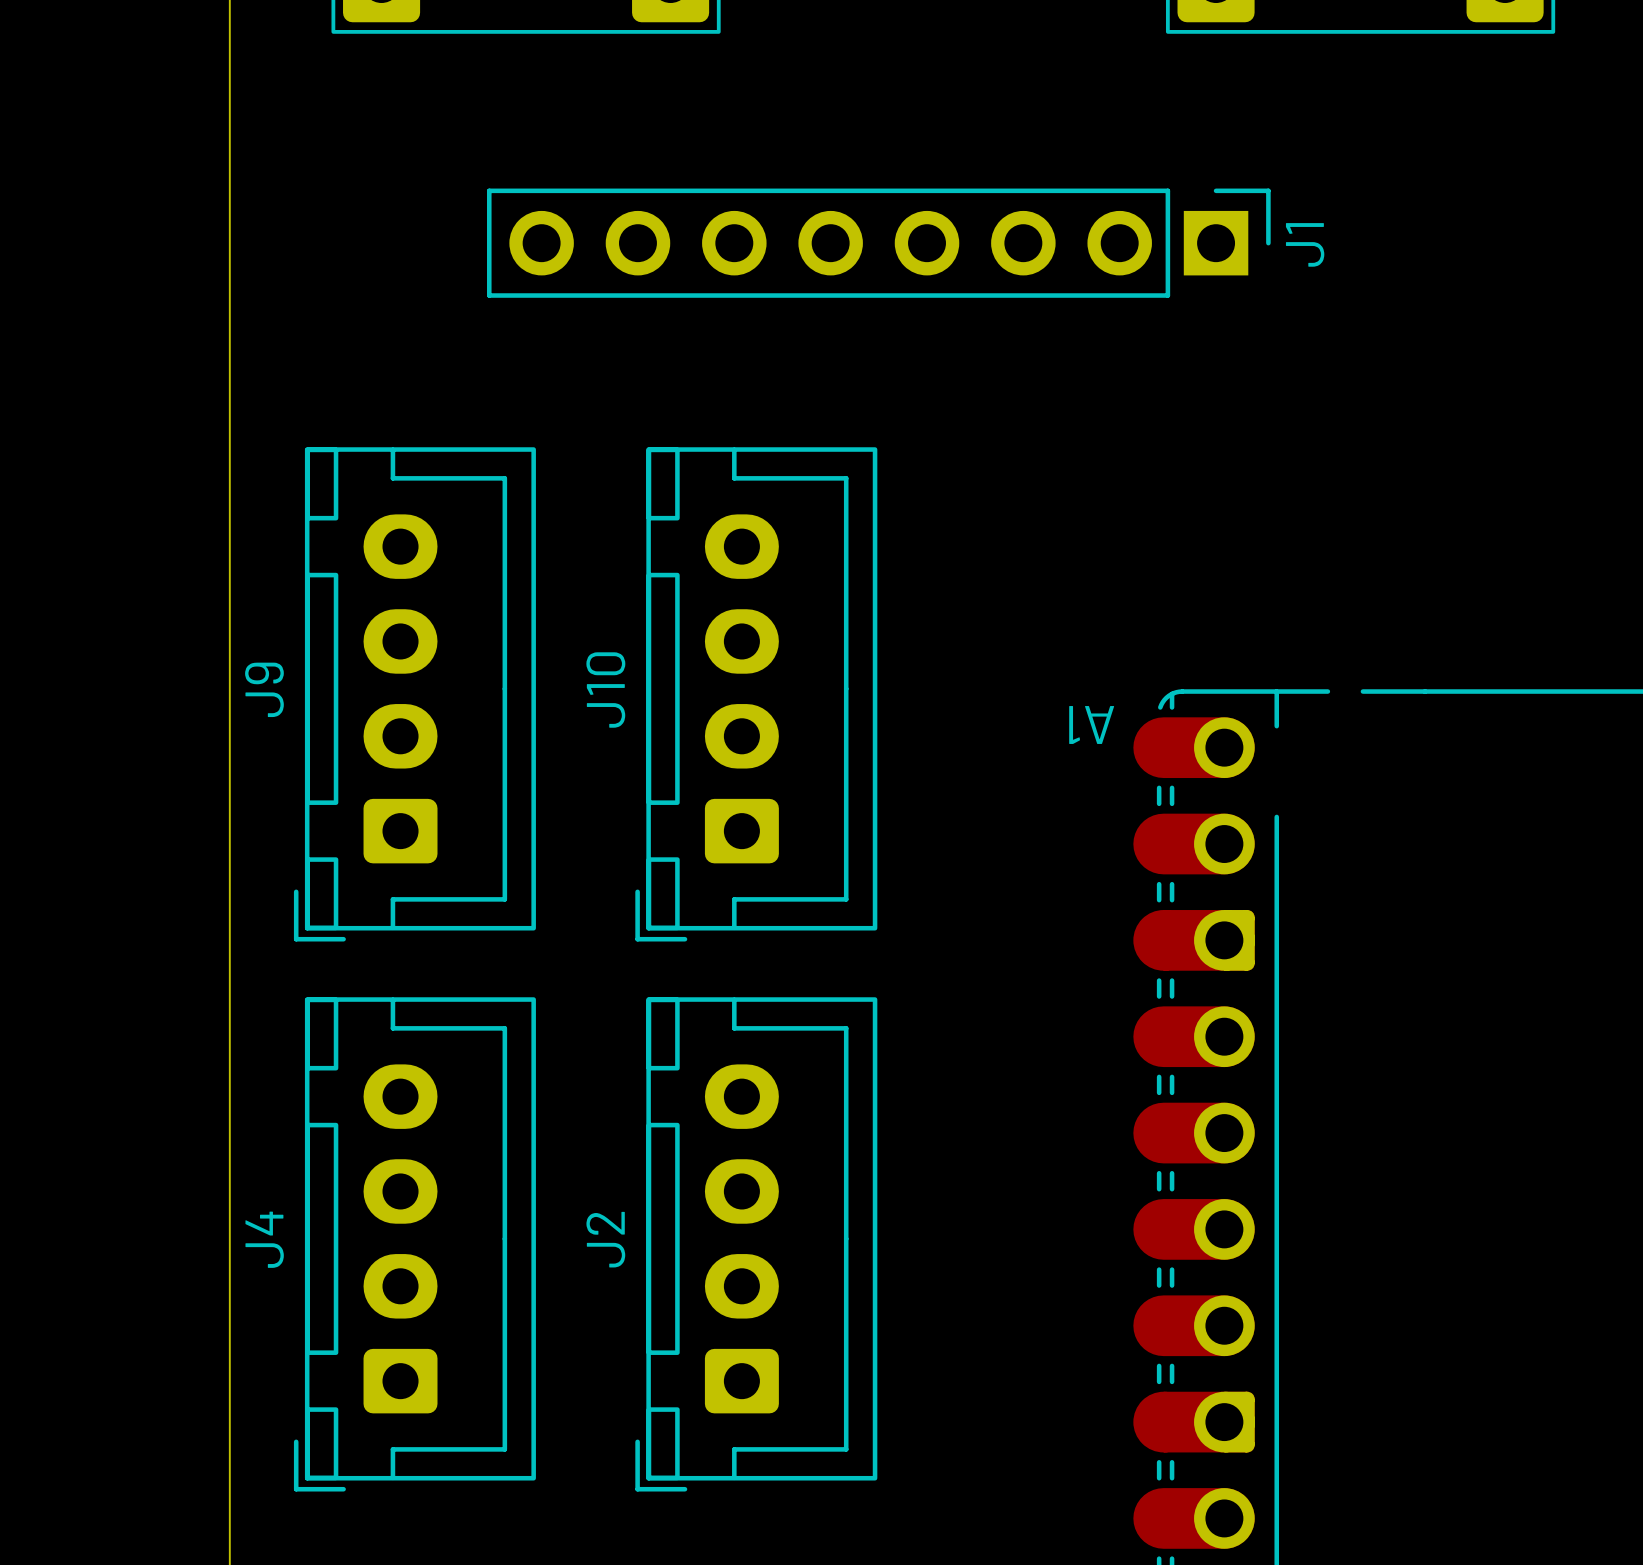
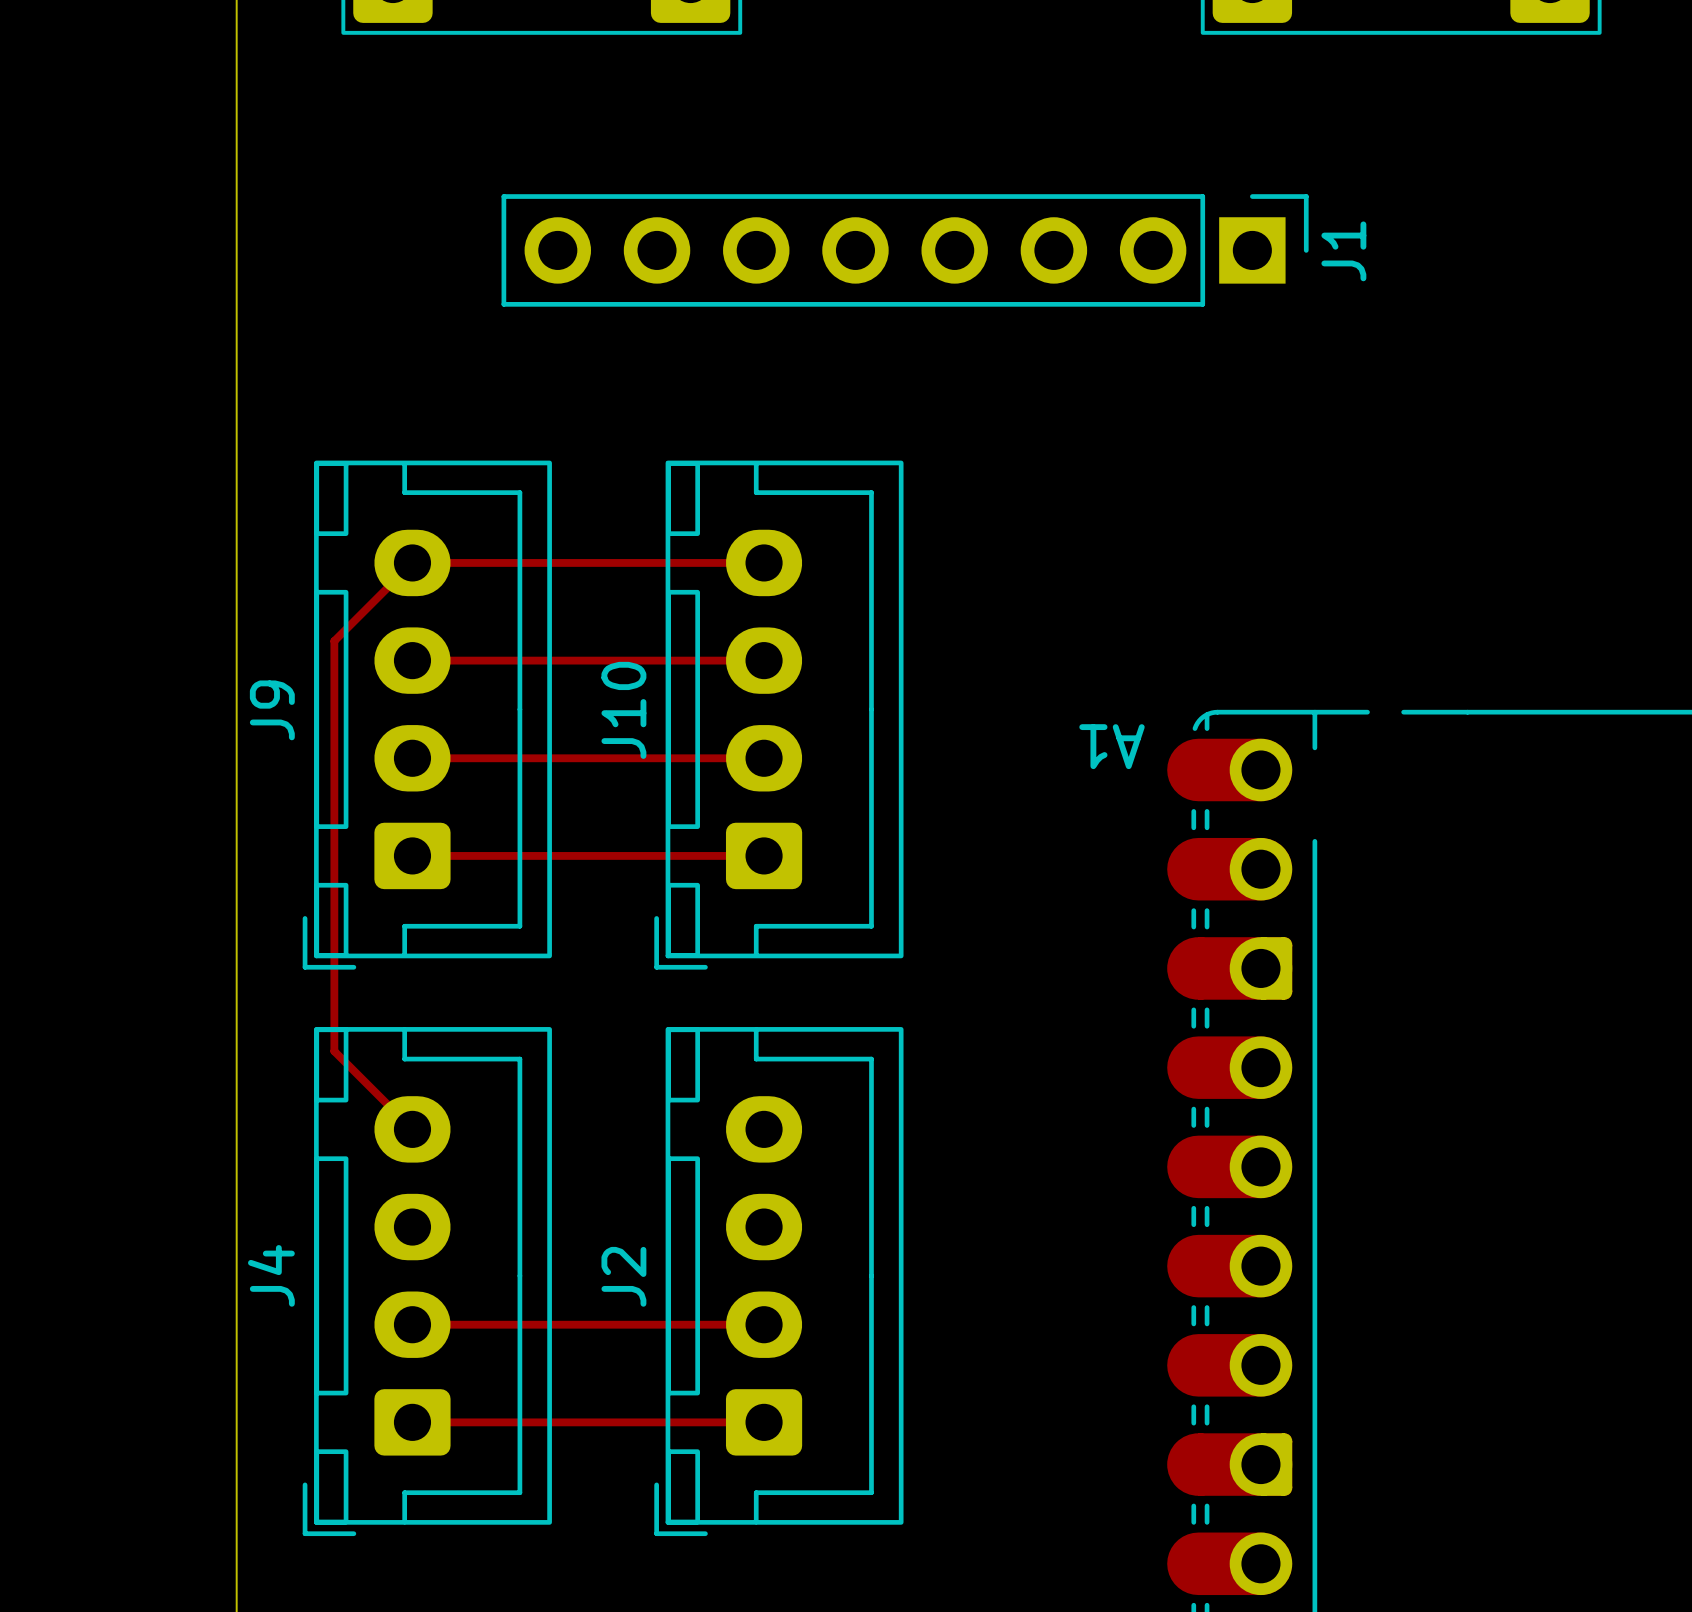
track: none -> (764, 562) (412, 562) (334, 641) (334, 1051) (412, 1129)
track: none -> (412, 660) (764, 660)
track: none -> (412, 758) (764, 758)
track: none -> (412, 855) (764, 855)
track: none -> (412, 1324) (764, 1324)
track: none -> (412, 1422) (764, 1422)

